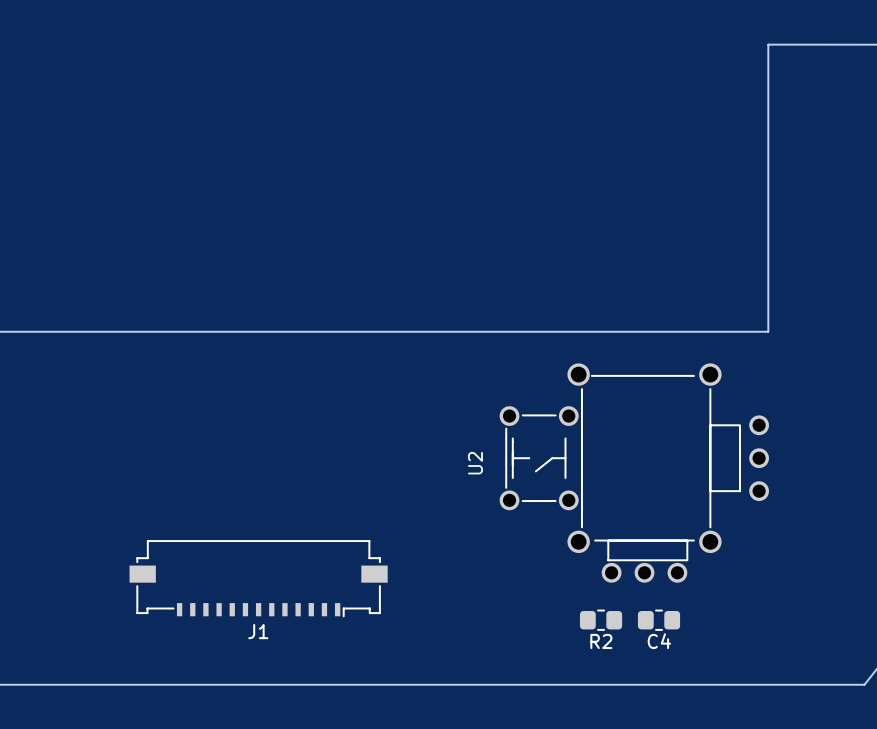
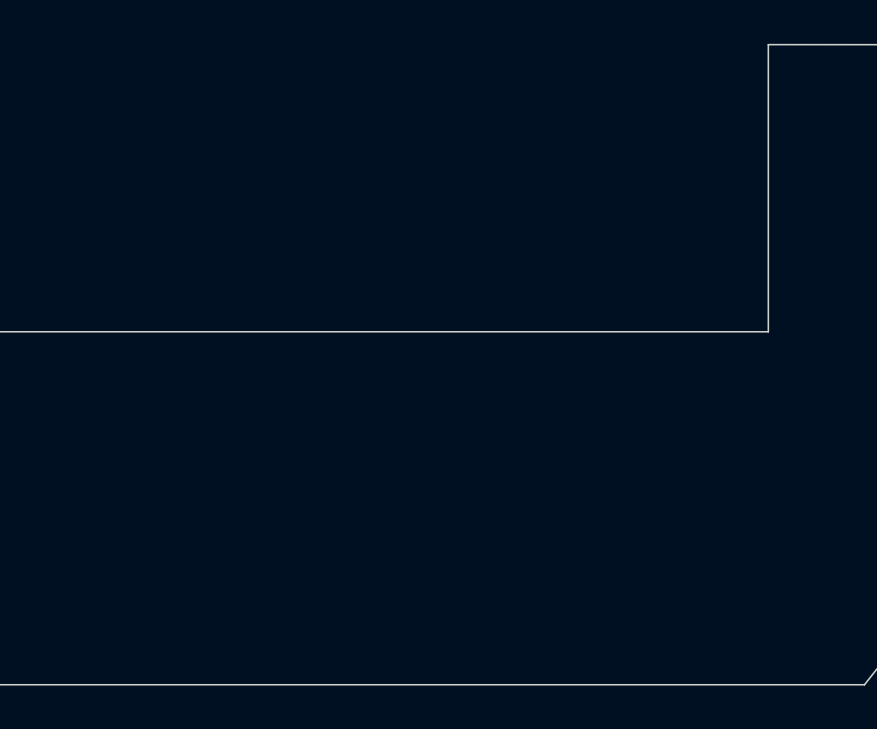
U2: (634, 473) -> none
J1: (258, 578) -> none
R2: (601, 620) -> none
C4: (659, 620) -> none

